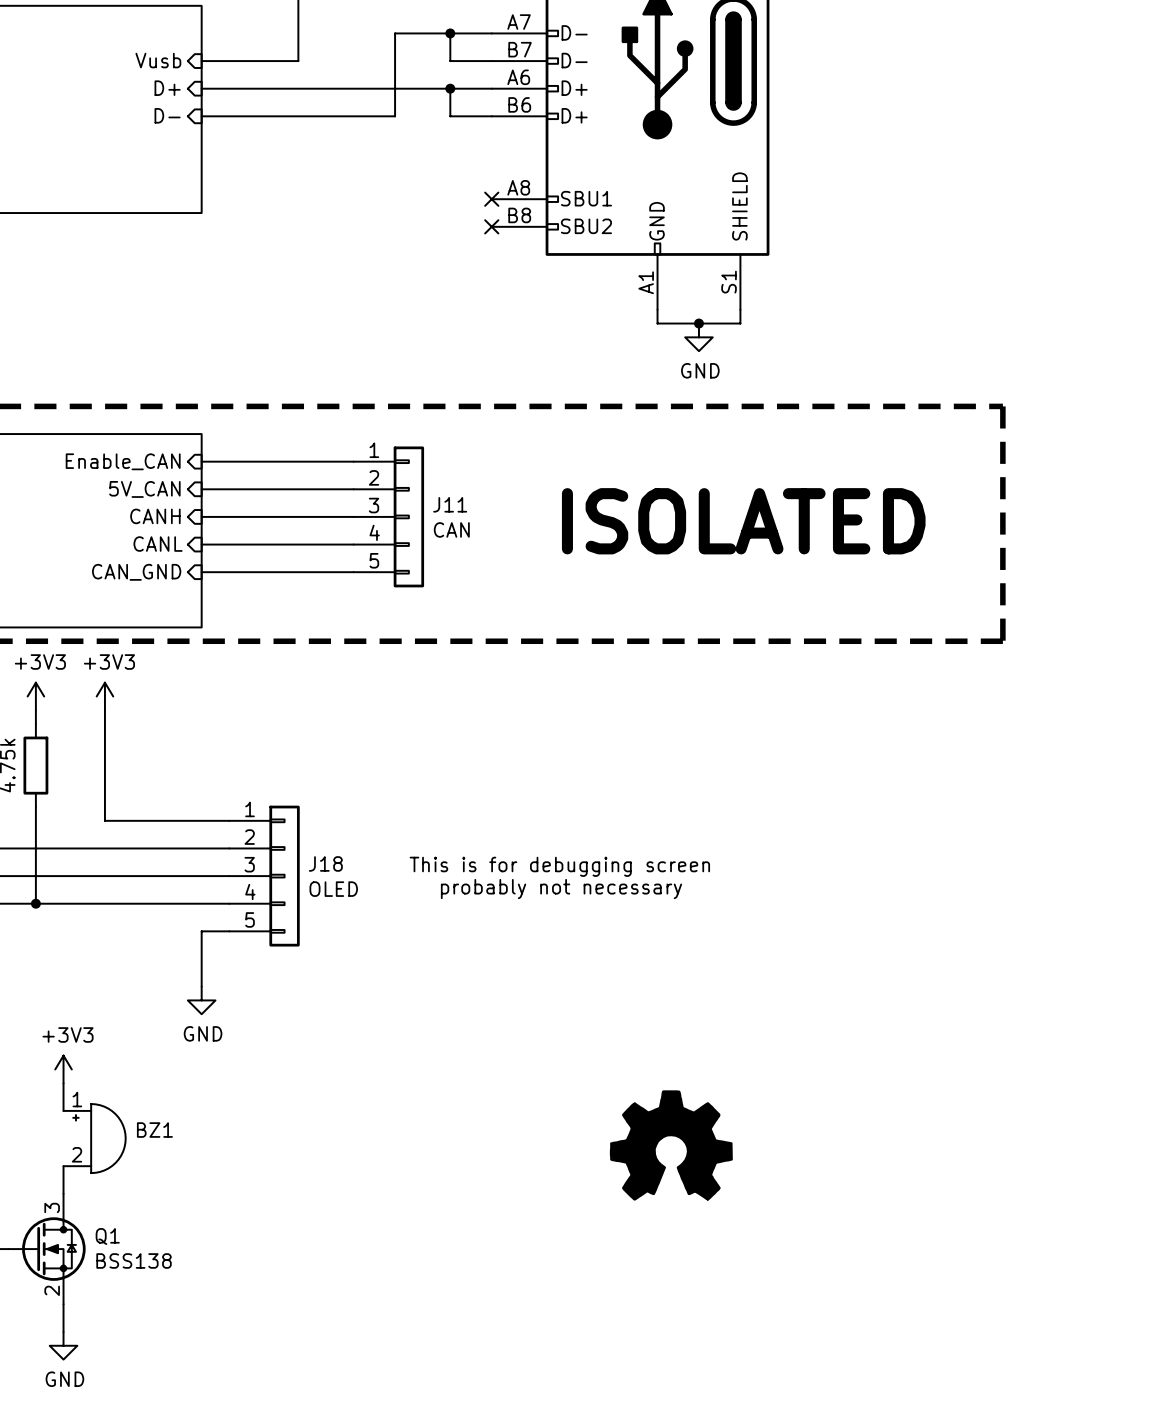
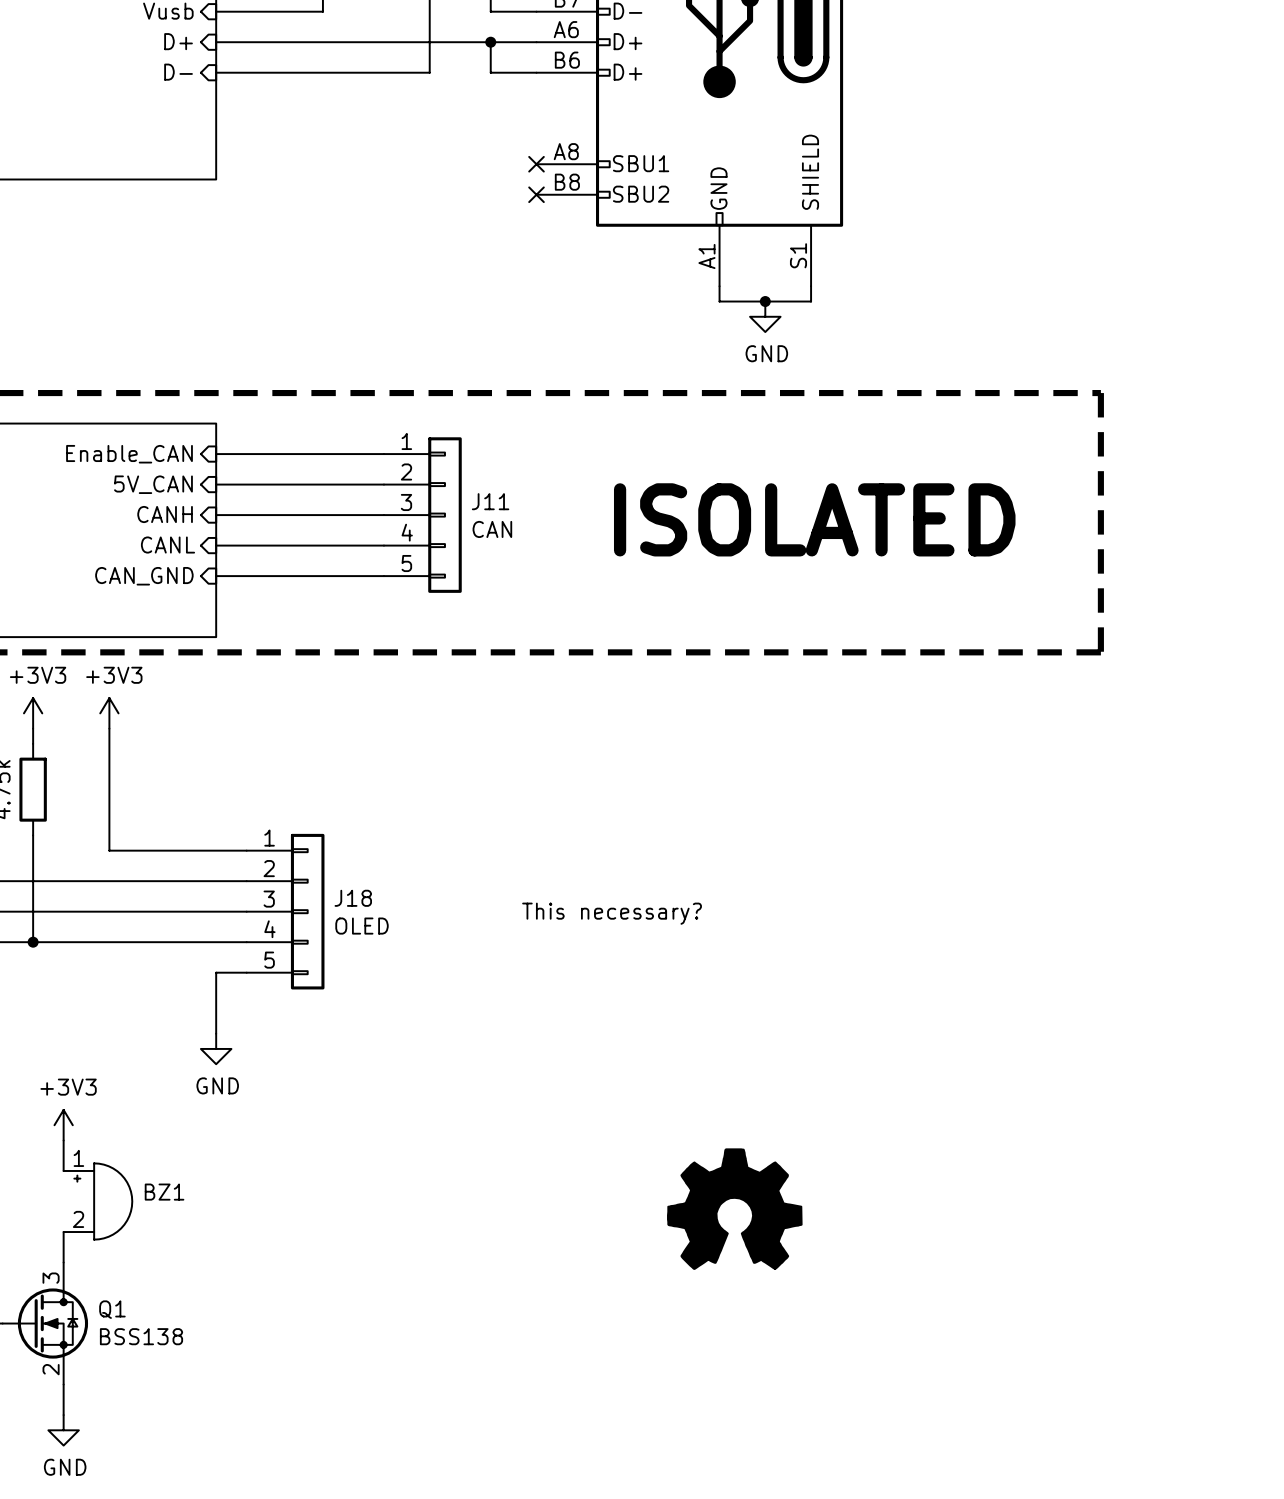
text: This is for debugging screen (559, 866) -> none
text: none -> This necessary? (612, 913)
text: probably not necessary (561, 889) -> none

